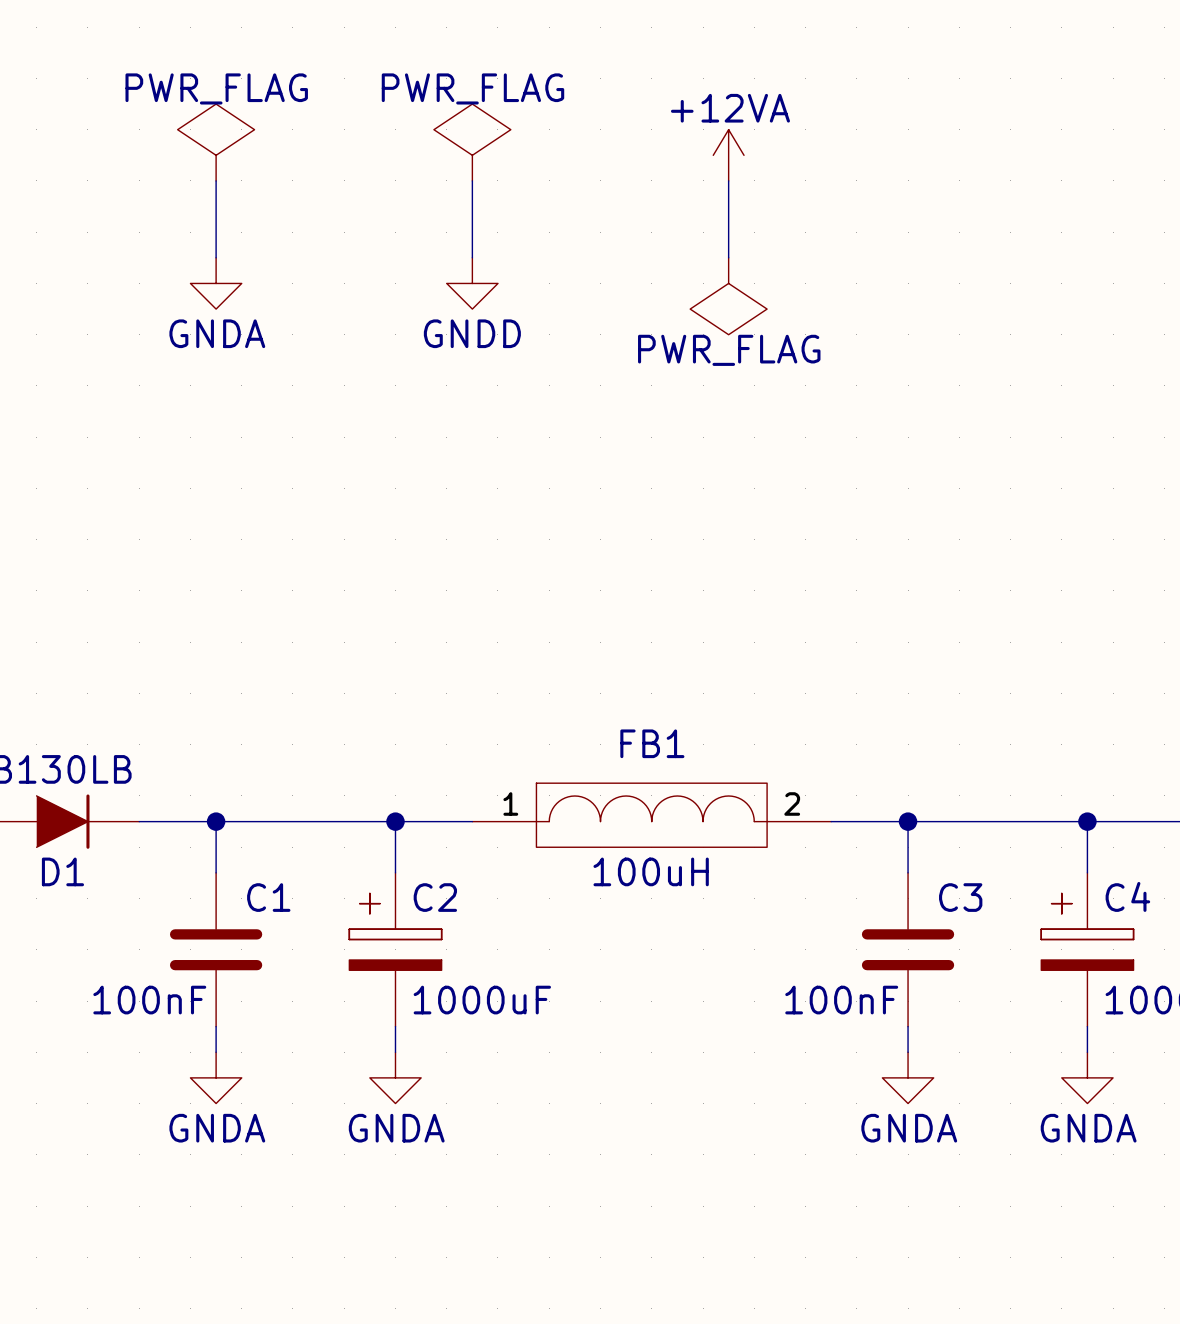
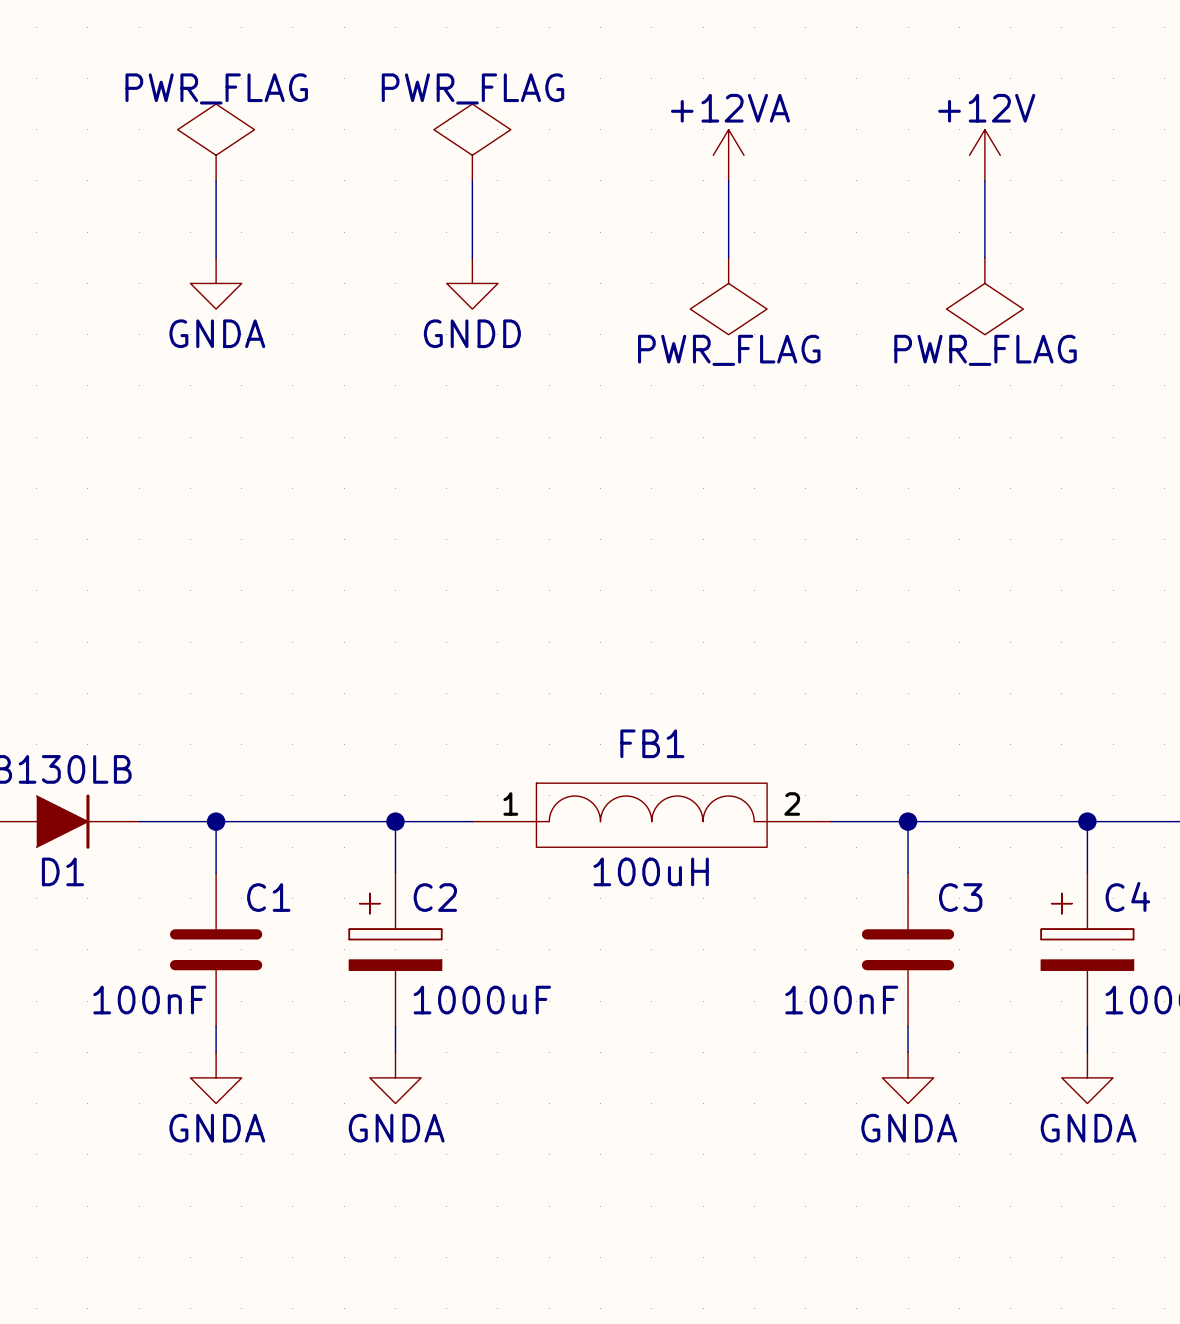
power symbol: none -> +12V (984, 155)
wire: none -> (984, 180) (984, 257)
power symbol: none -> PWR_FLAG (984, 296)

